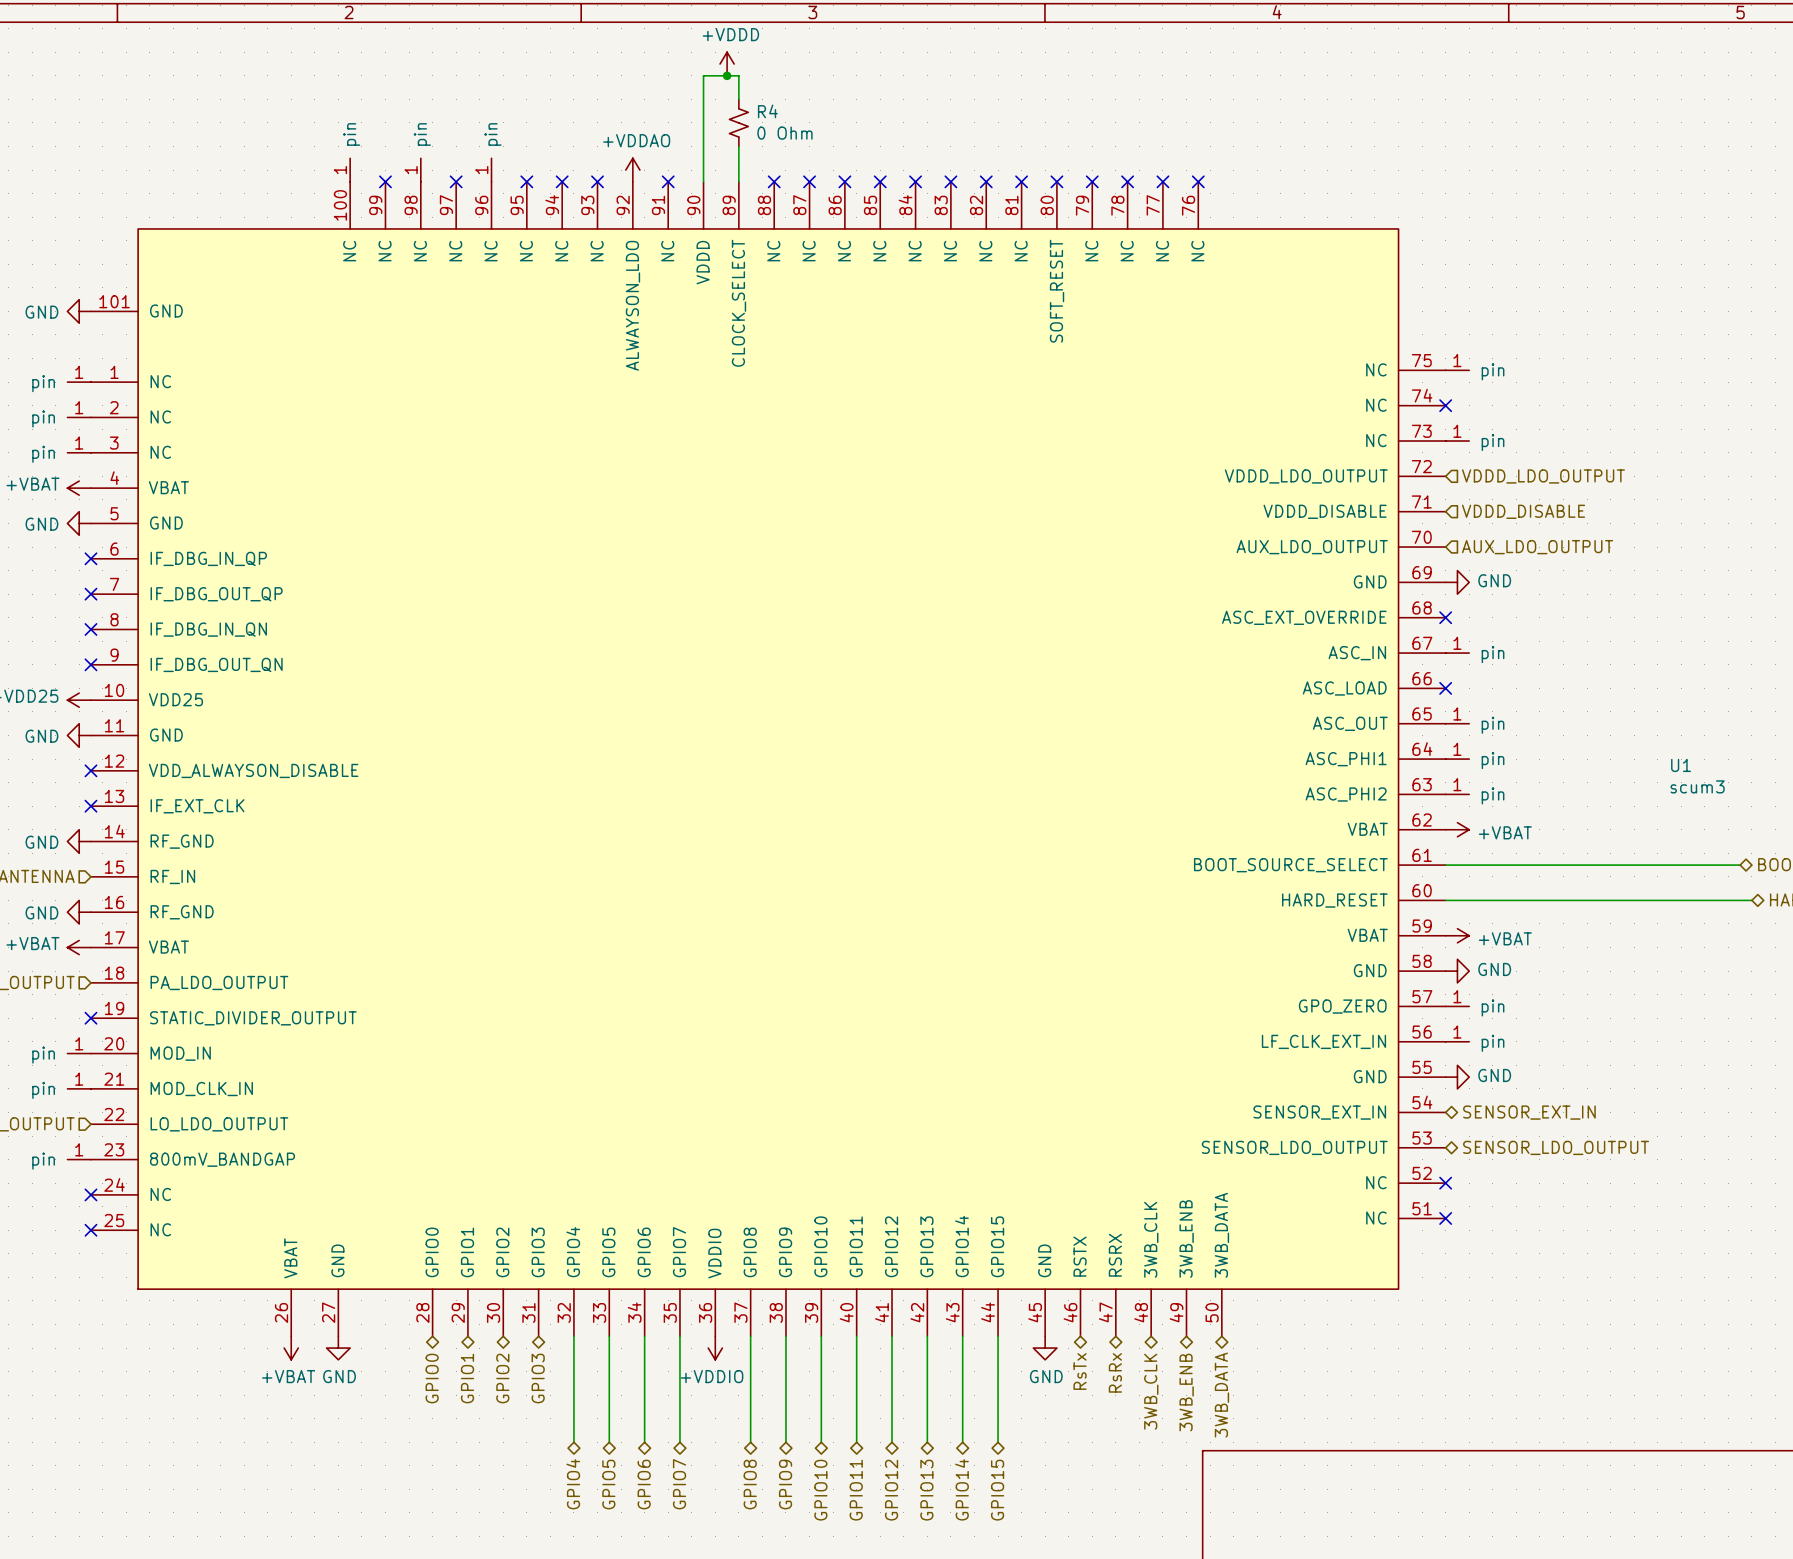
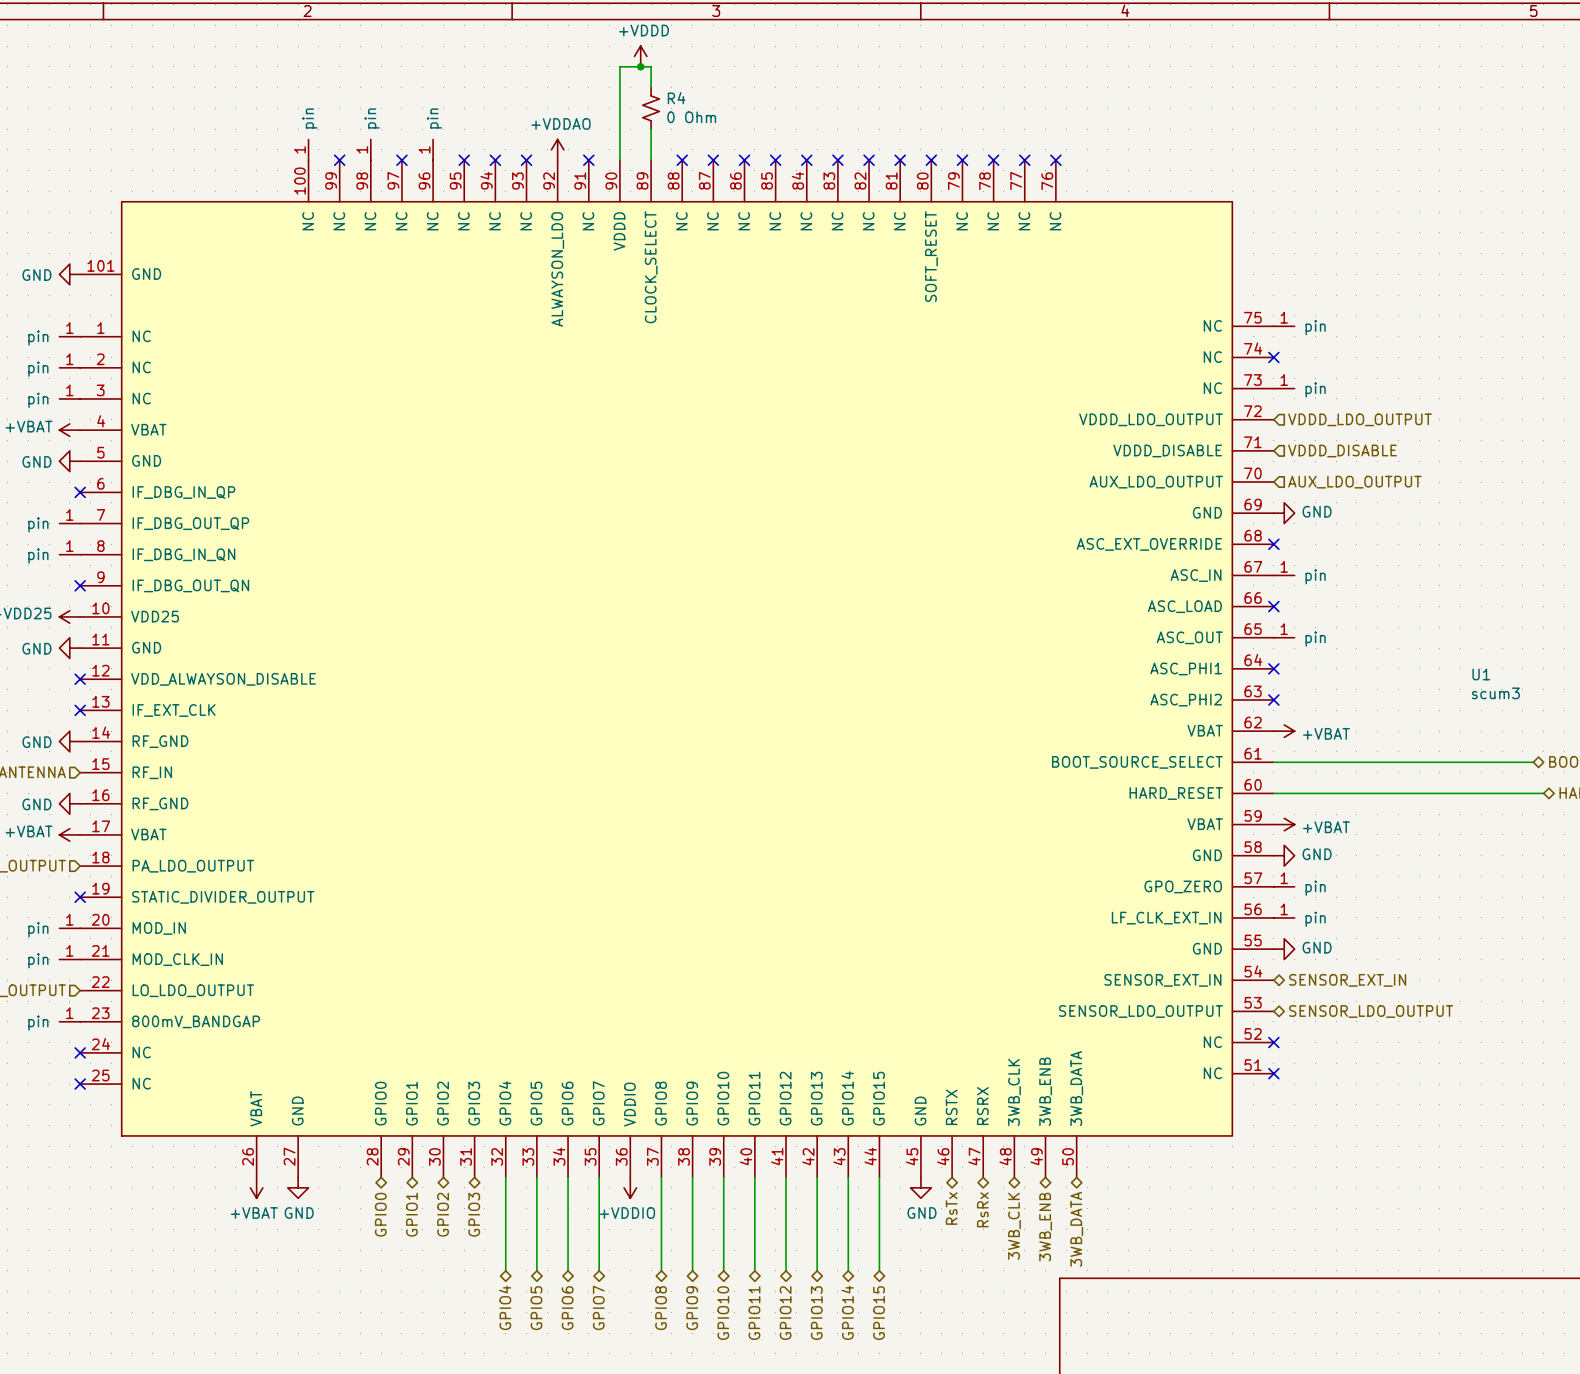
part: none -> (69, 523)
no-connect mark: (90, 594) -> none
part: none -> (69, 554)
no-connect mark: (90, 629) -> none
no-connect mark: none -> (1273, 668)
part: (1457, 759) -> none
no-connect mark: none -> (1273, 700)
part: (1457, 794) -> none

